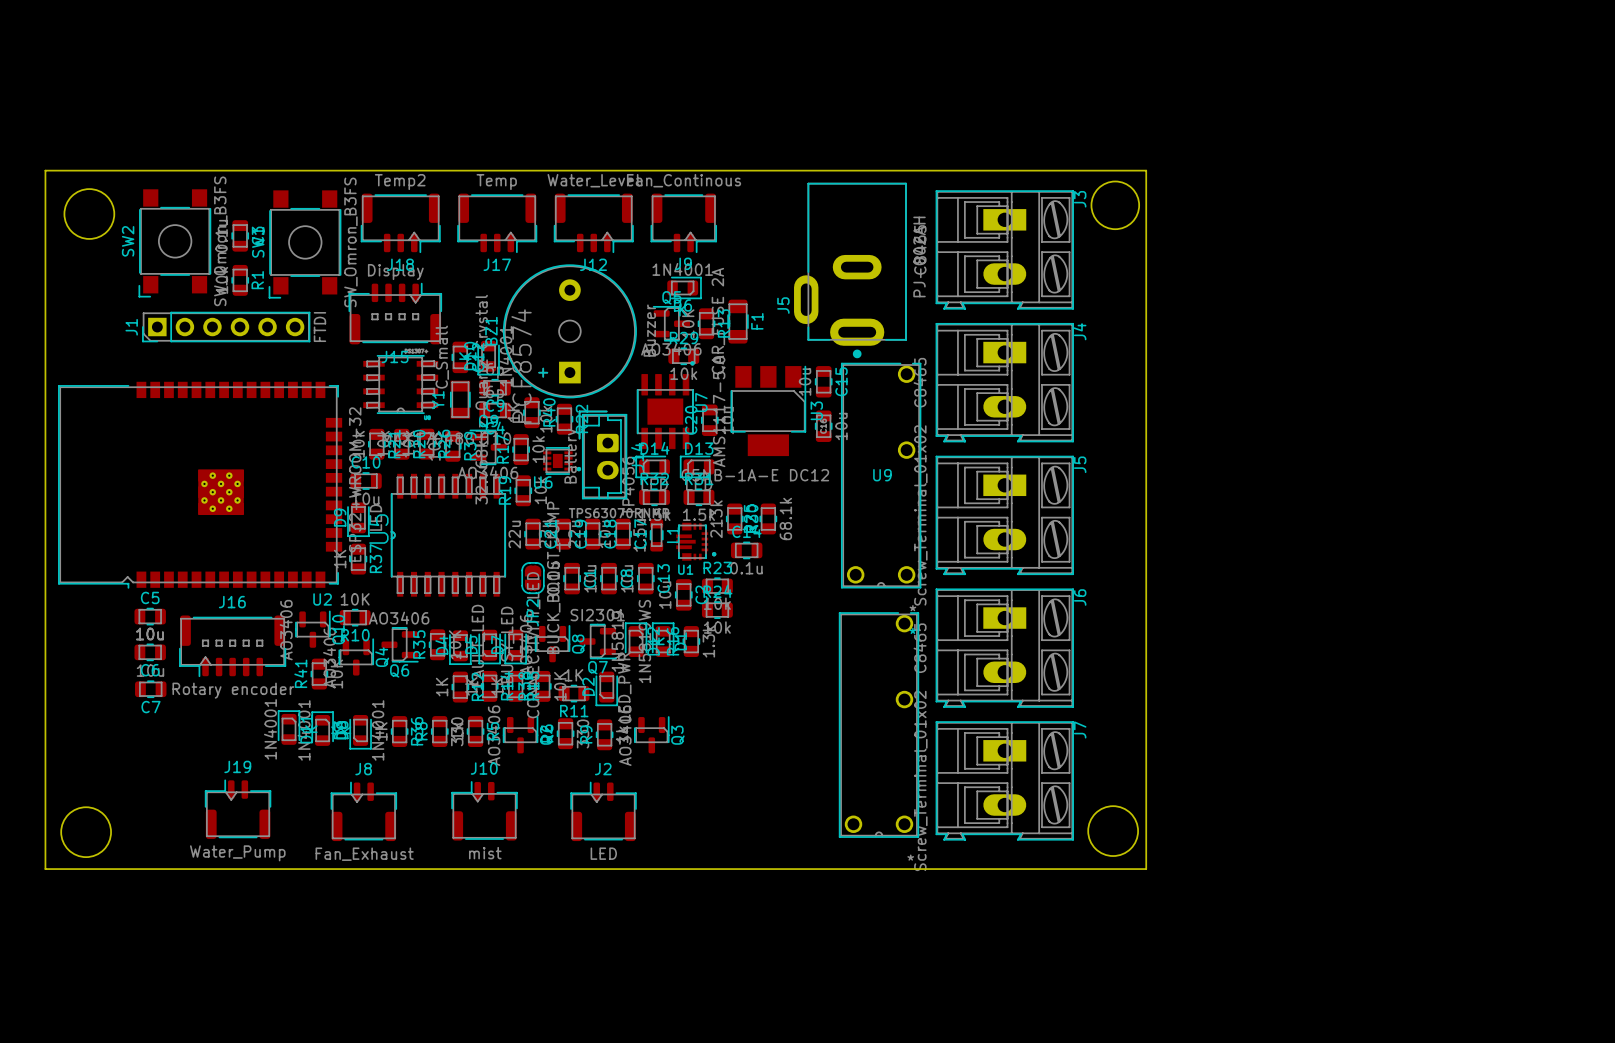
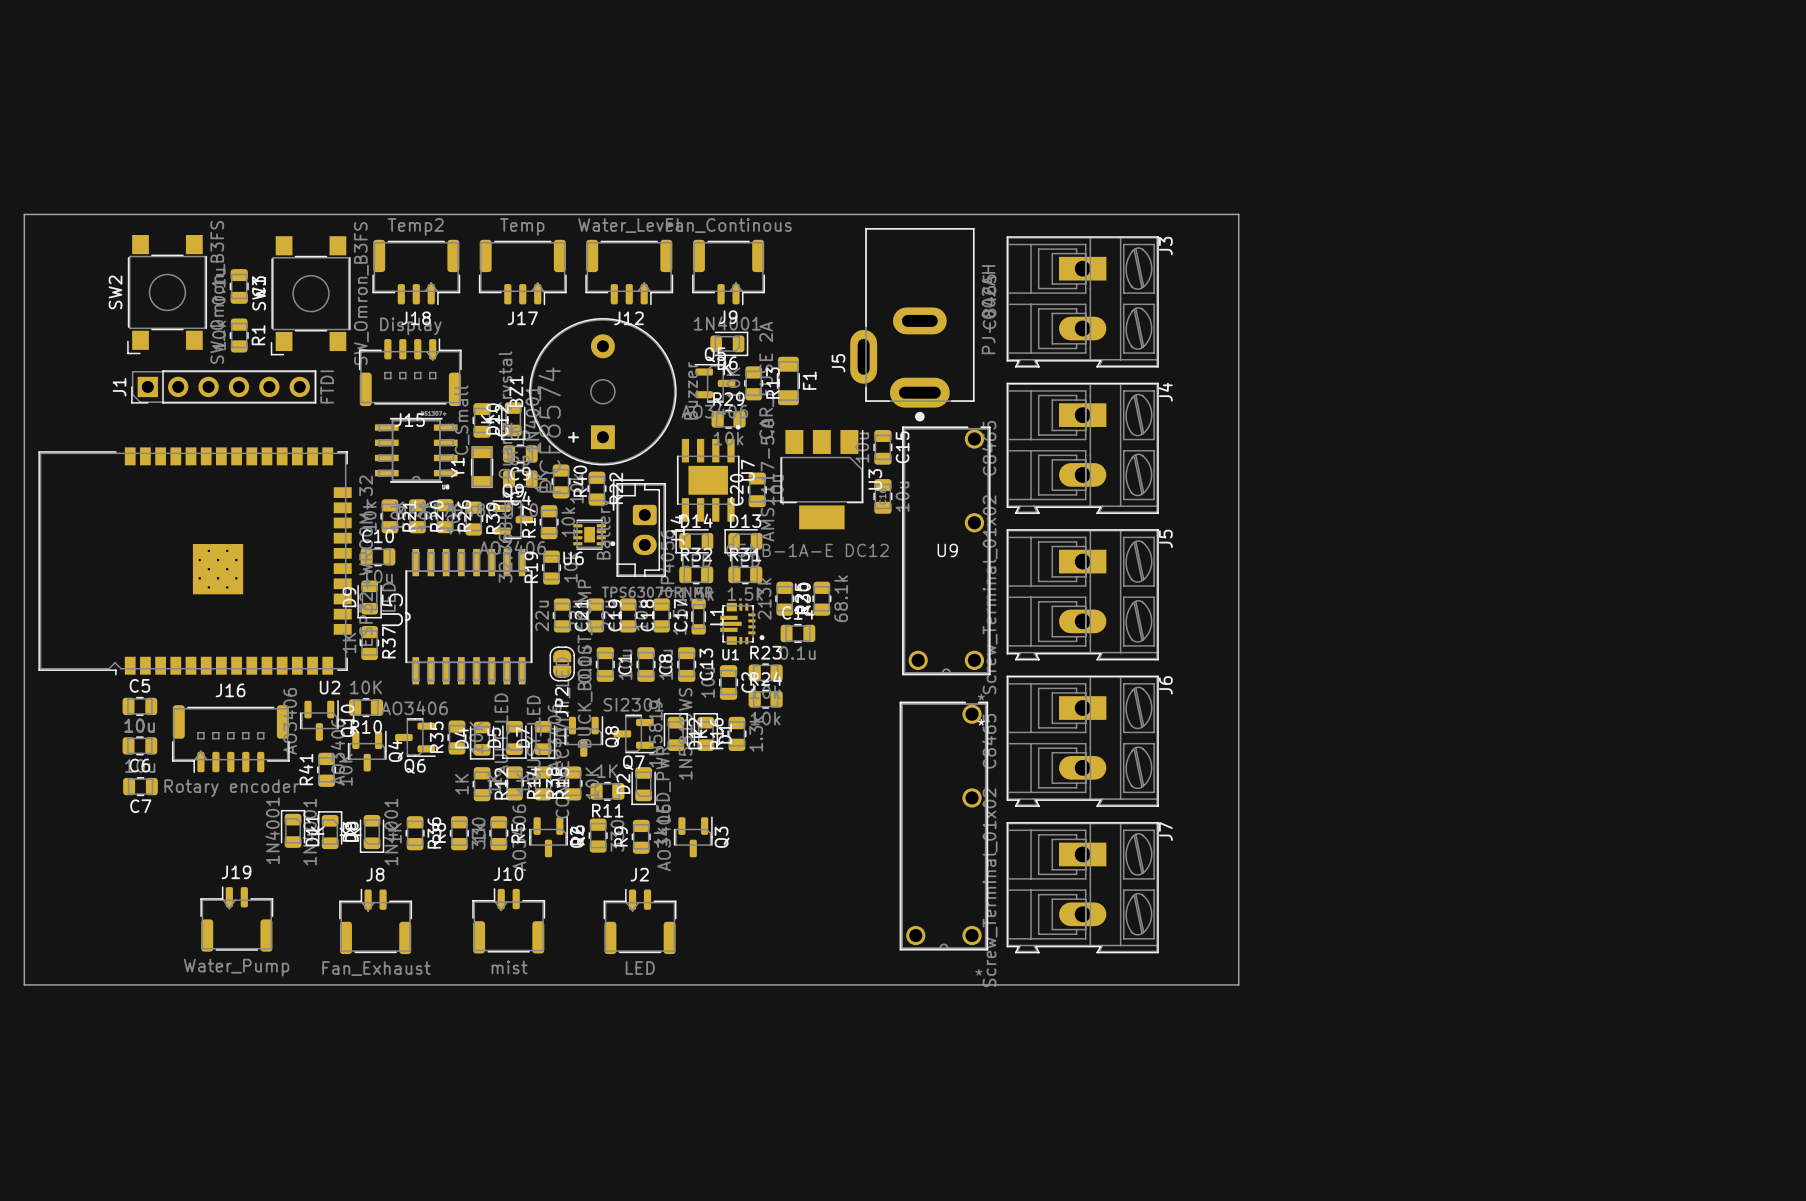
round board edge: [1090, 180, 1140, 230] -> none
round board edge: [63, 188, 115, 240] -> none
round board edge: [1087, 805, 1139, 857] -> none
round board edge: [60, 806, 112, 858] -> none

